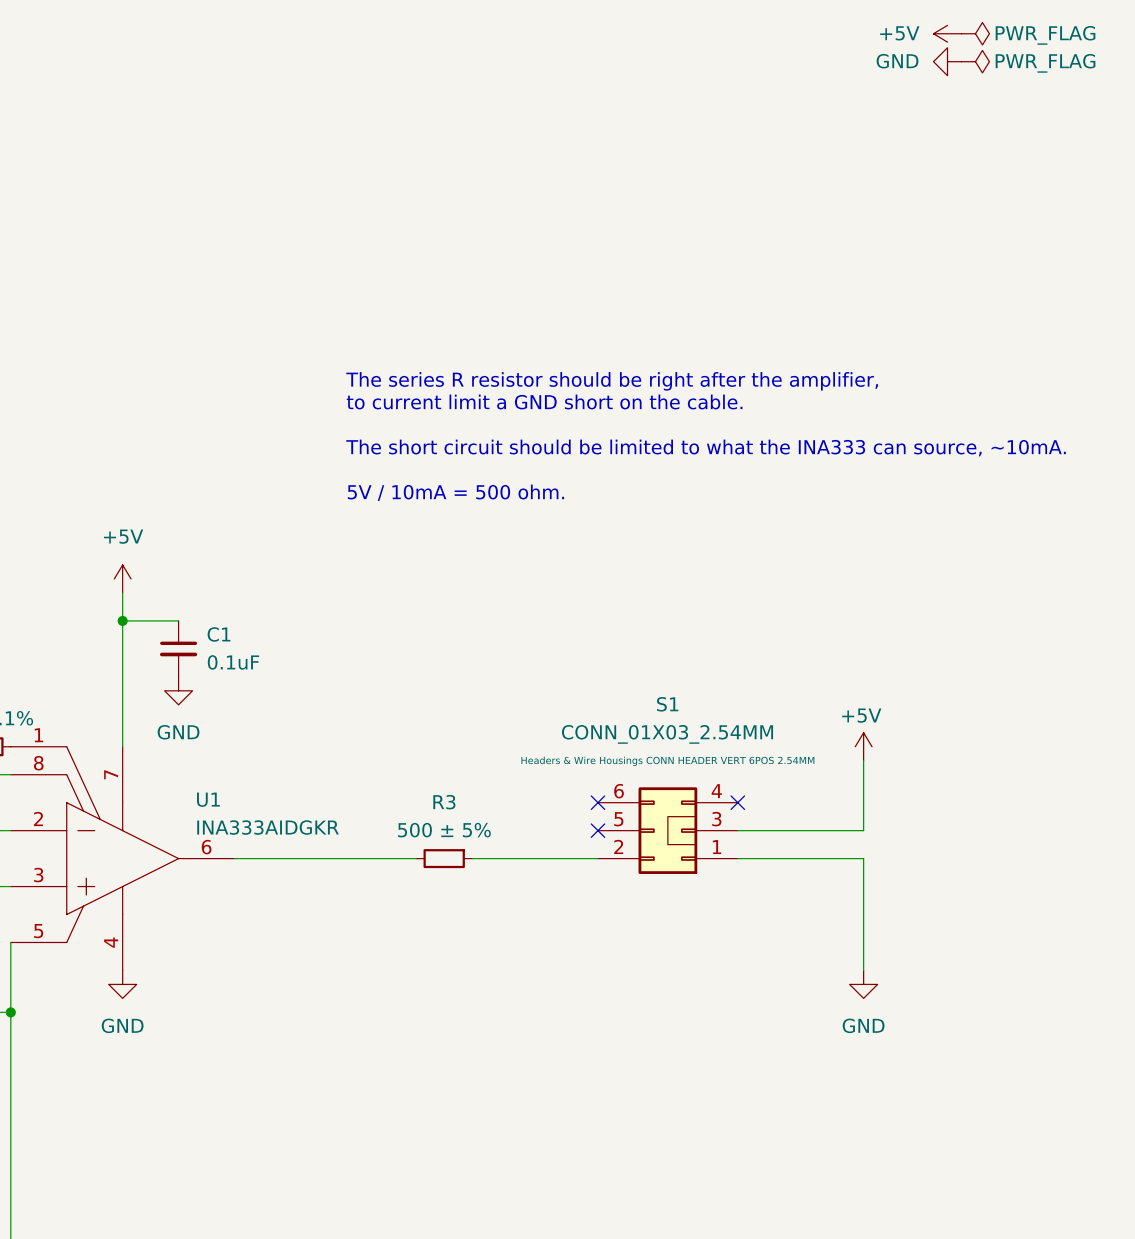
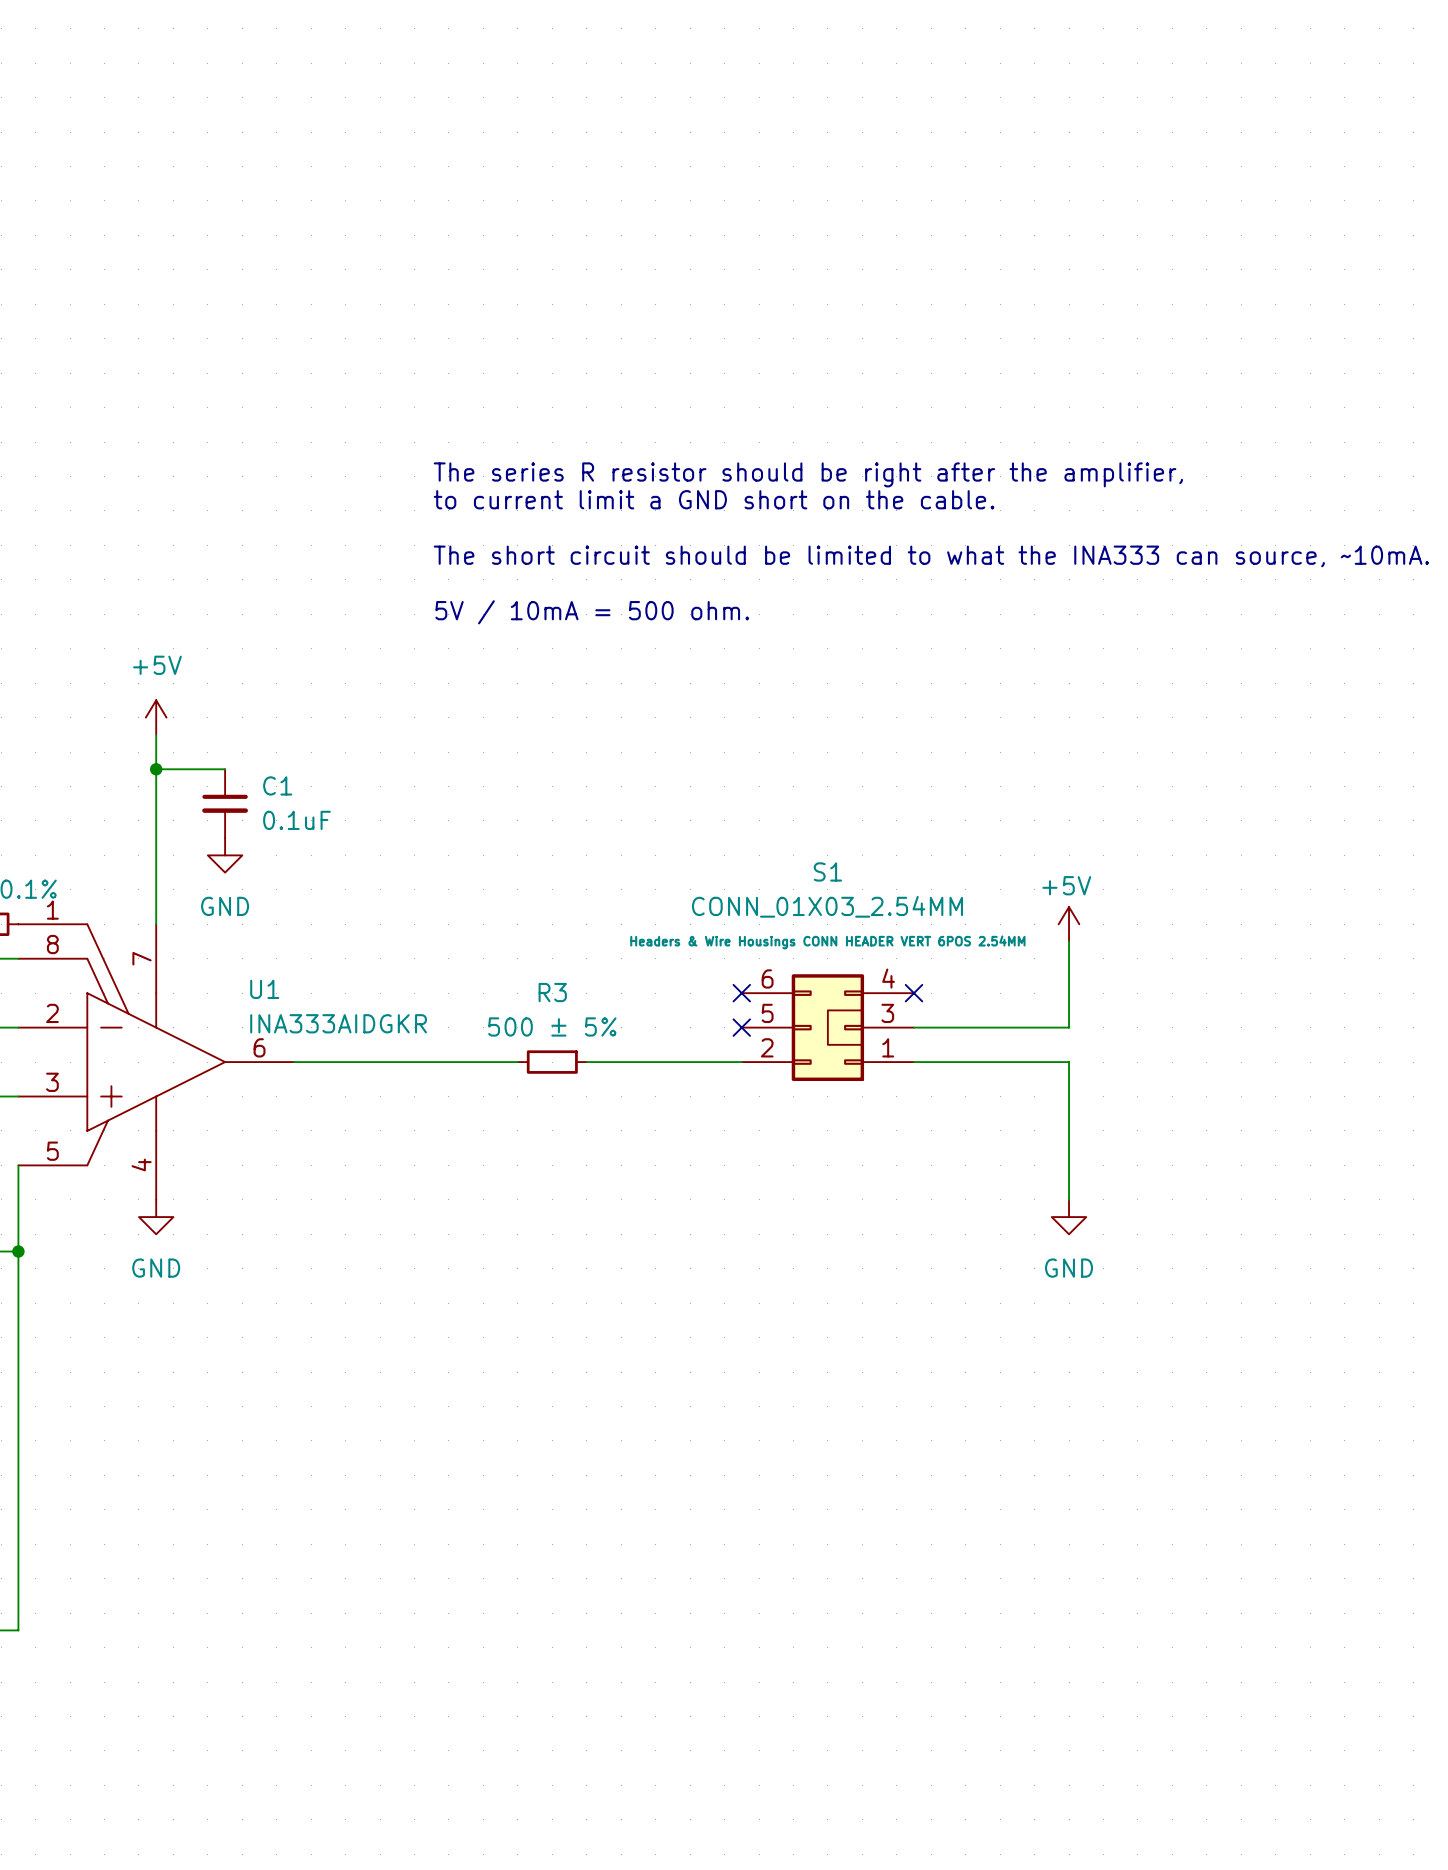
power symbol: +5V (947, 33) -> none
power symbol: PWR_FLAG (975, 33) -> none
power symbol: GND (947, 61) -> none
power symbol: PWR_FLAG (975, 61) -> none

